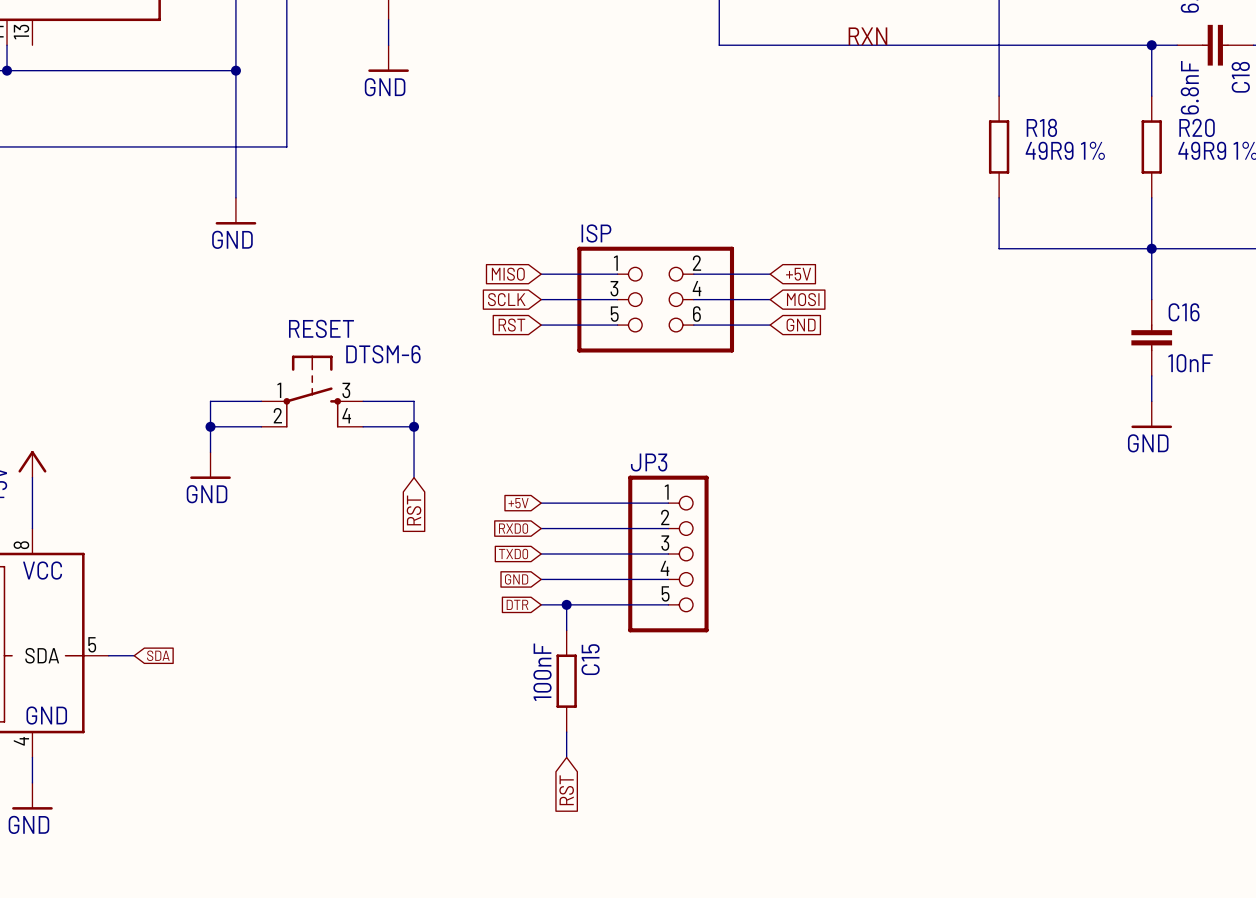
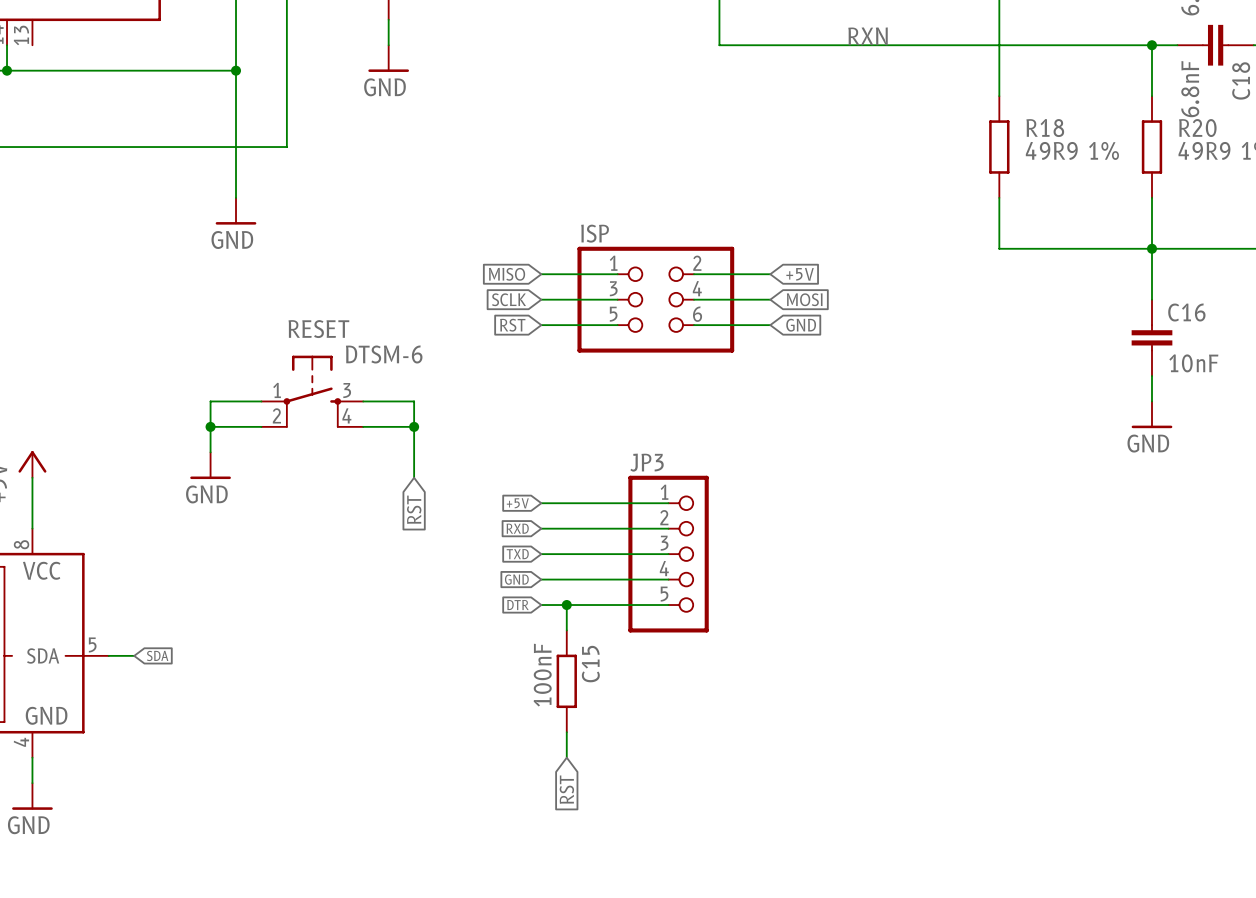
global label: RXD0 (513, 528) -> RXD (517, 528)
global label: TXD0 (513, 554) -> TXD (517, 554)

